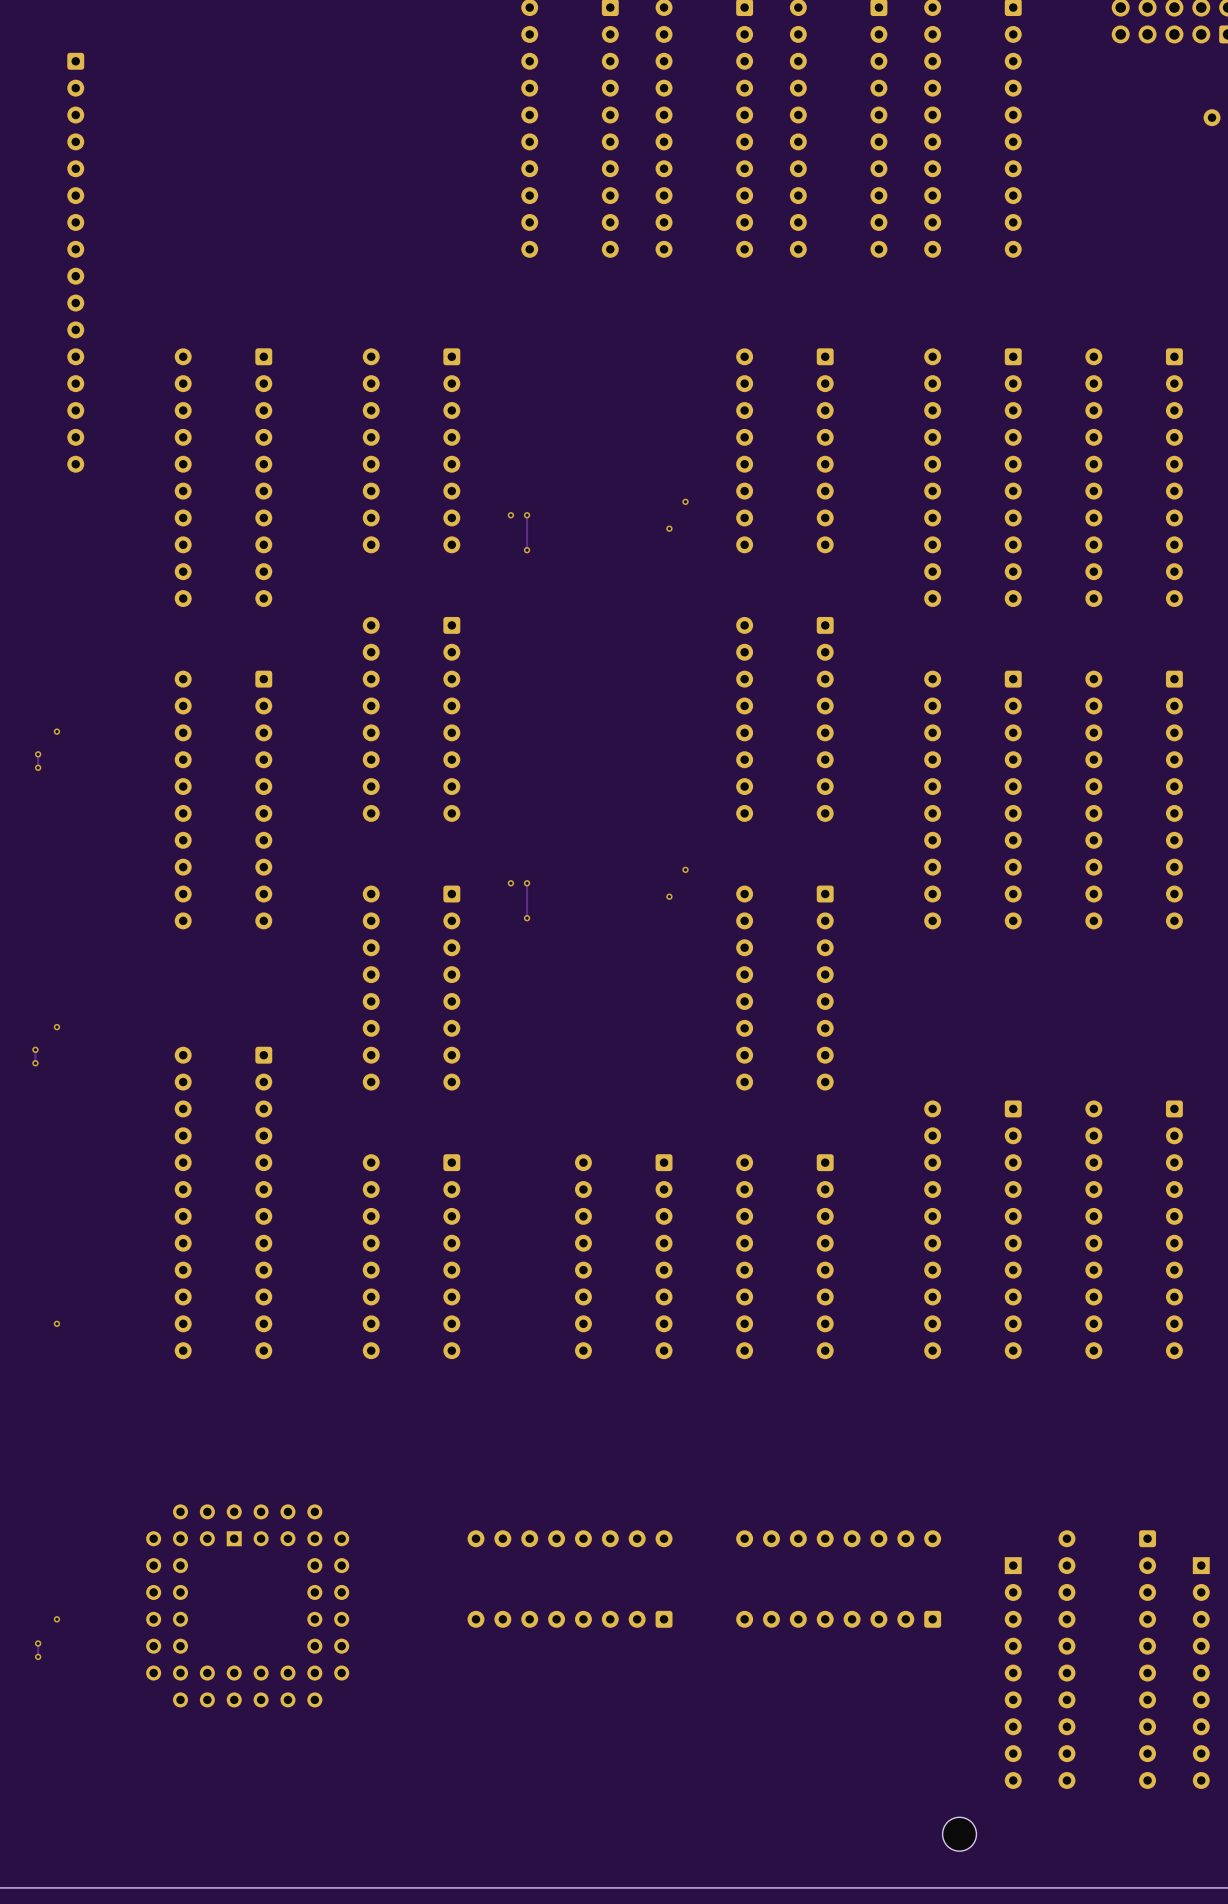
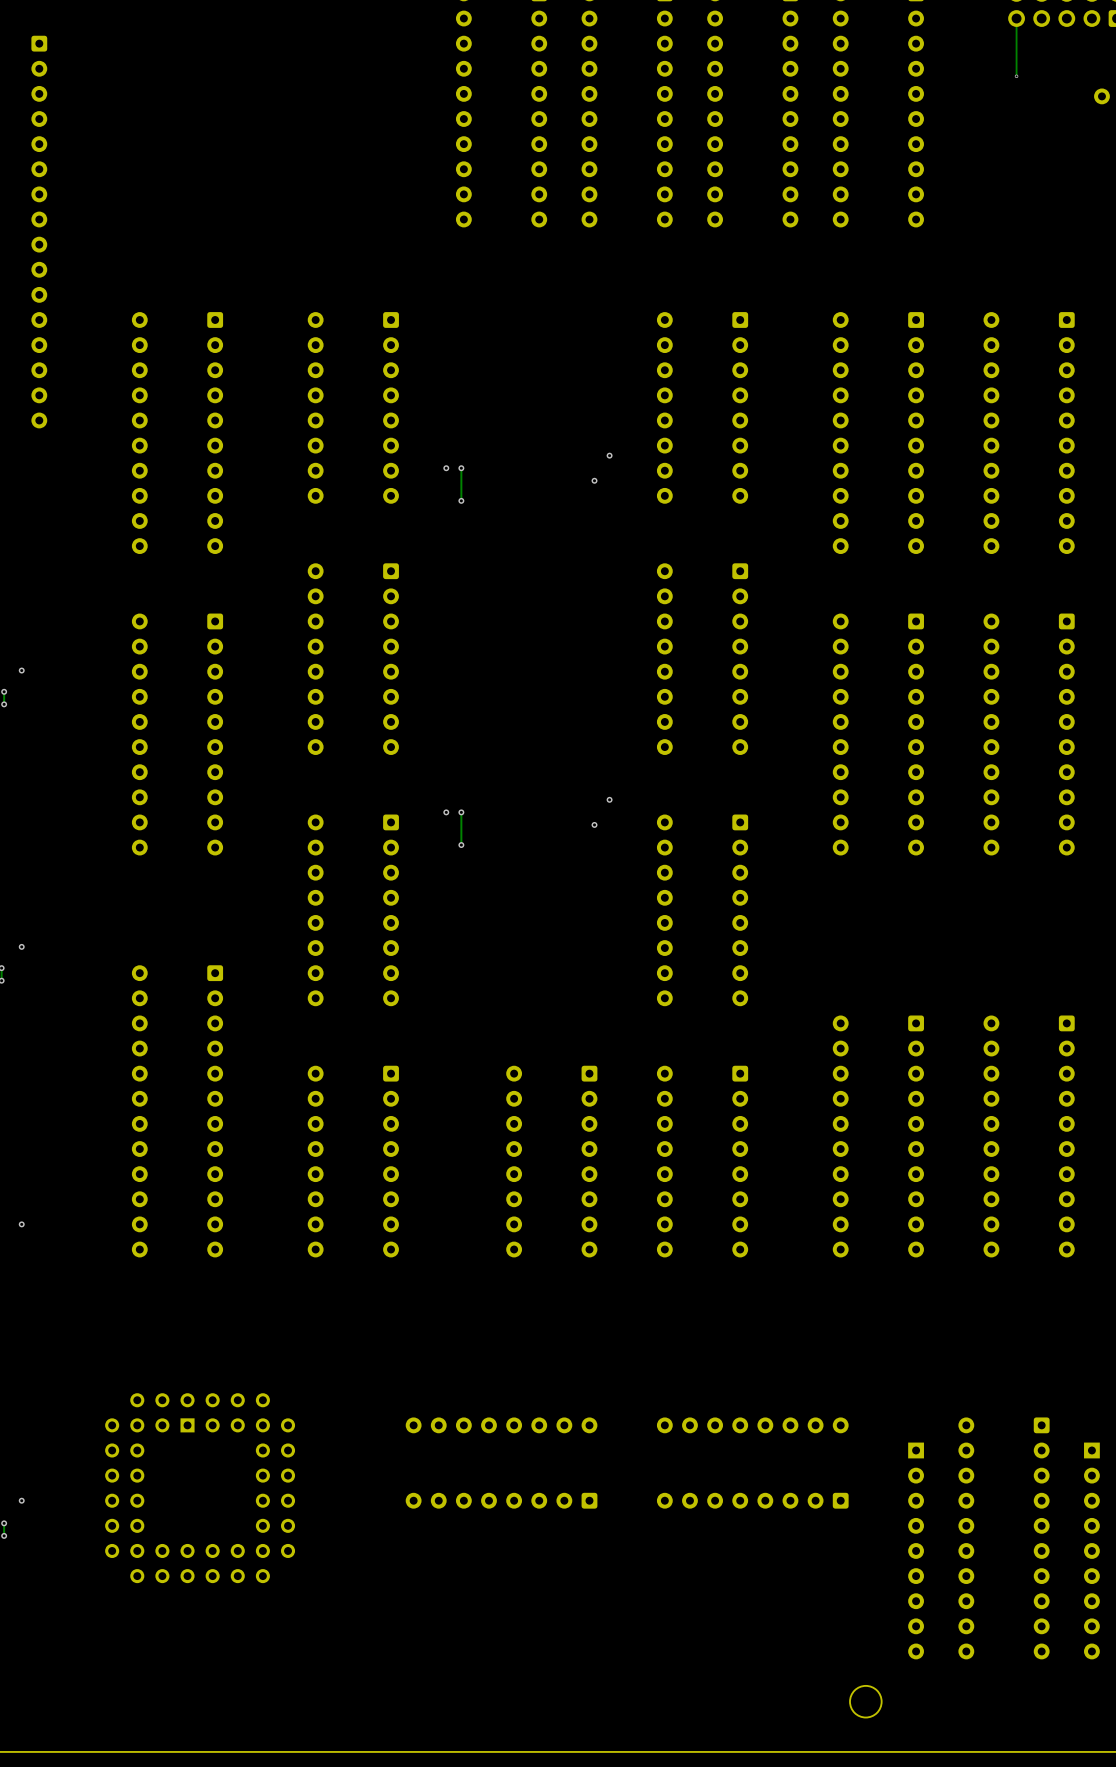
track: none -> (1016, 18) (1016, 76)
via: none -> (1016, 76)

